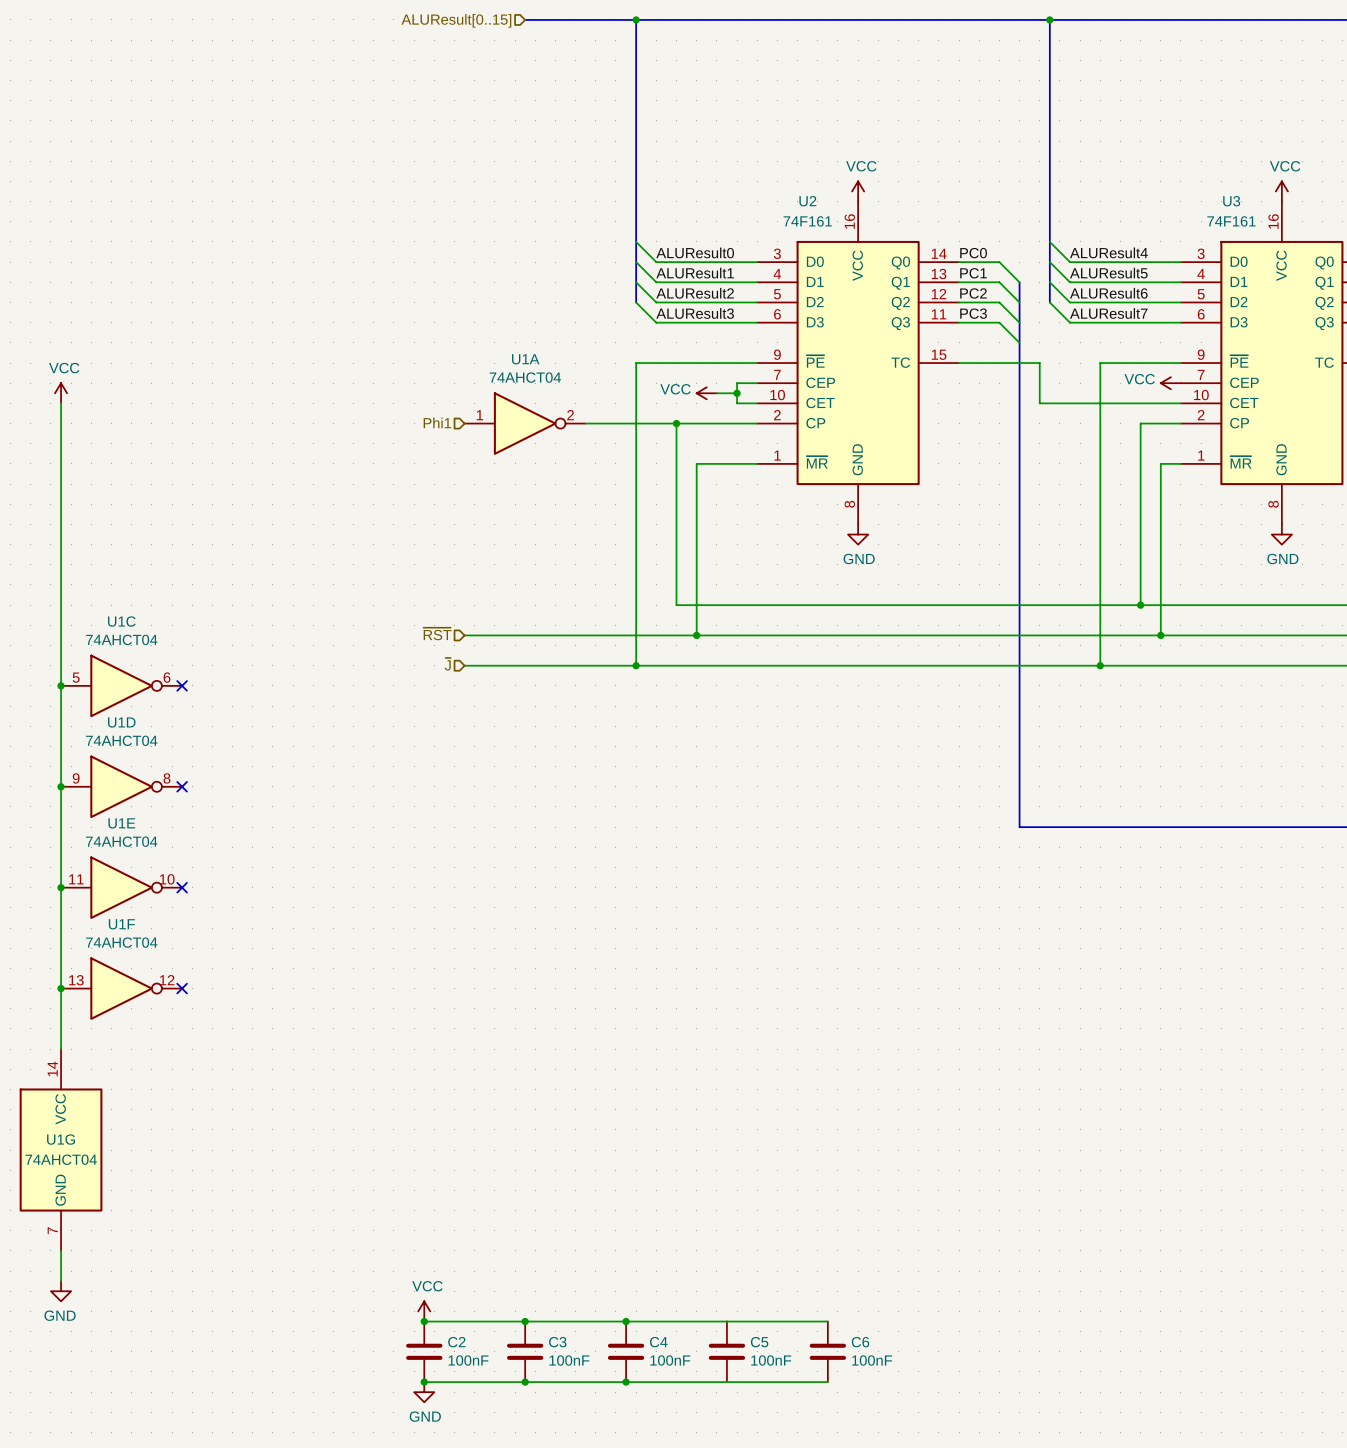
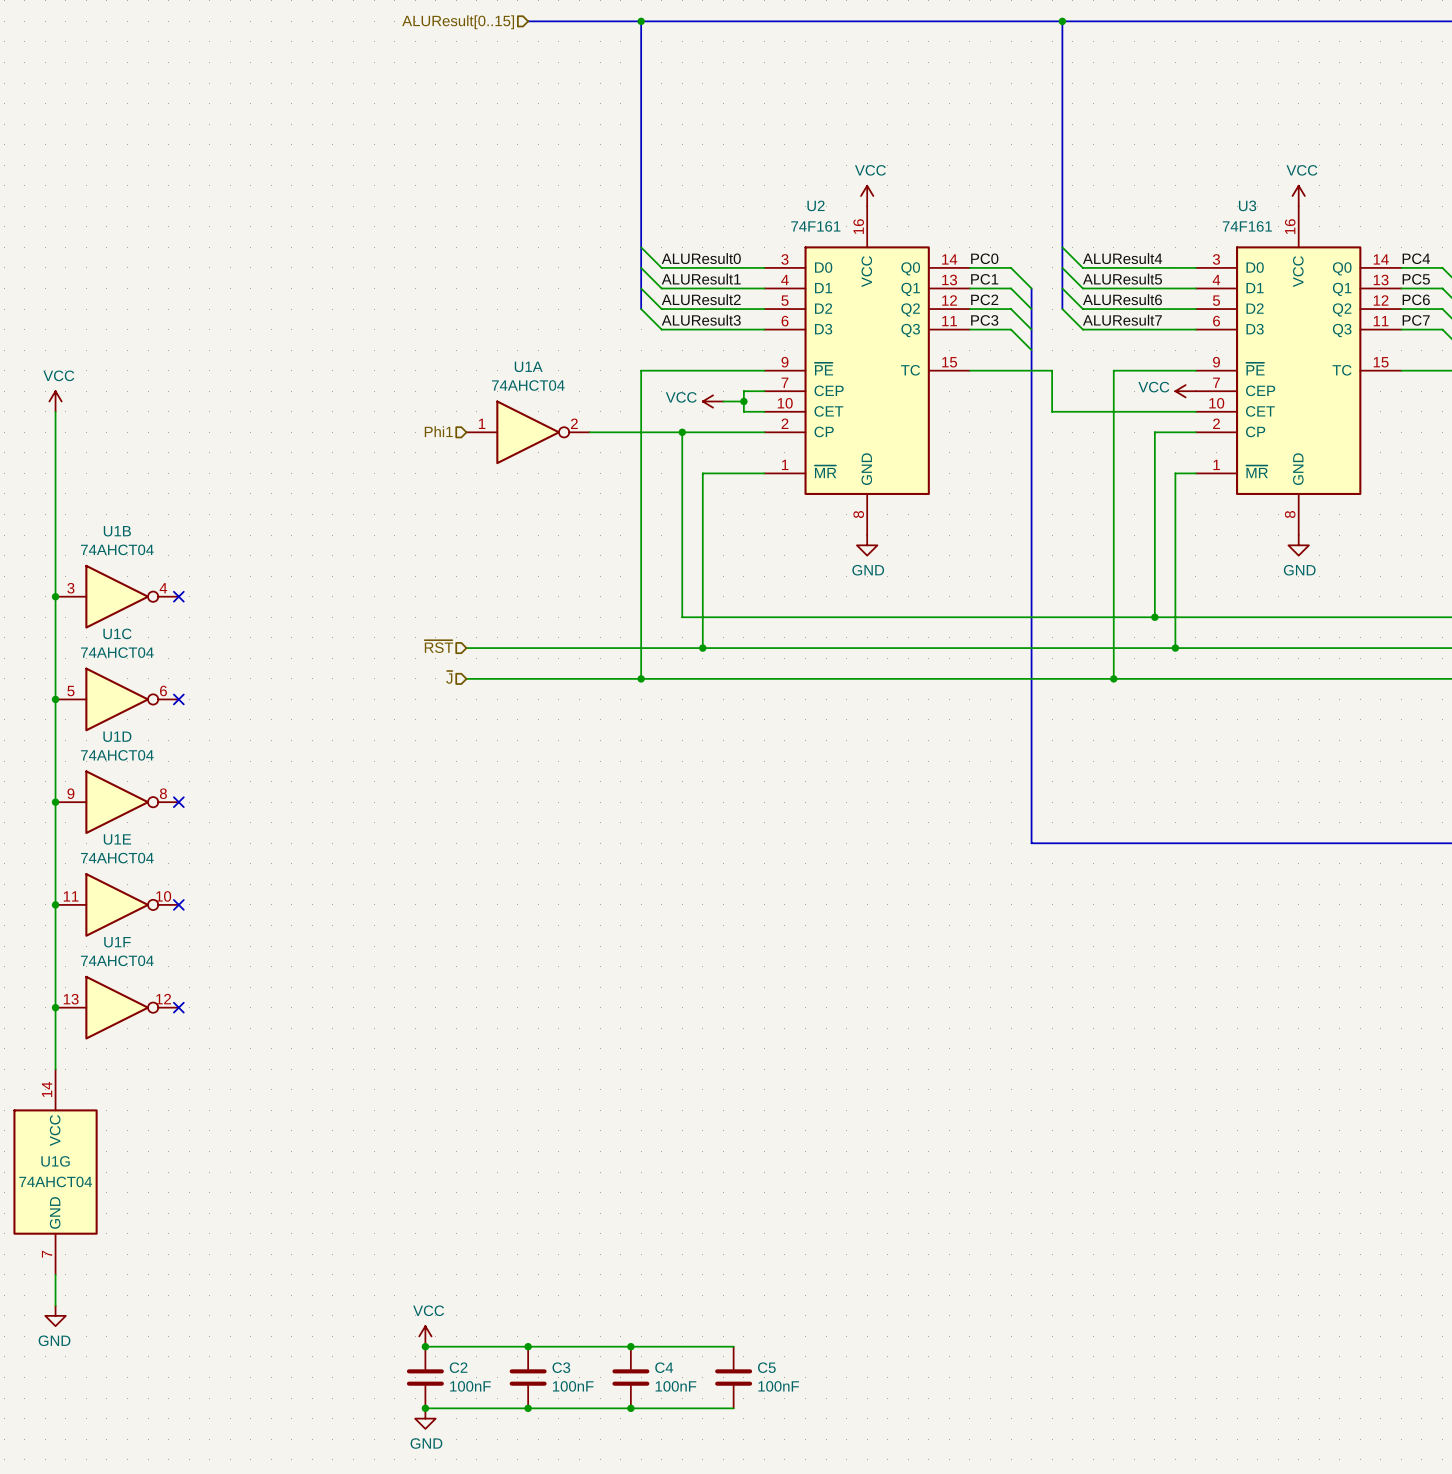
junction: none -> (55, 596)
U1B: none -> 74AHCT04 (117, 596)
no-connect mark: none -> (178, 596)
wire: (726, 1321) (827, 1321) -> none
C6: 100nF (827, 1351) -> none
wire: (726, 1382) (827, 1382) -> none

